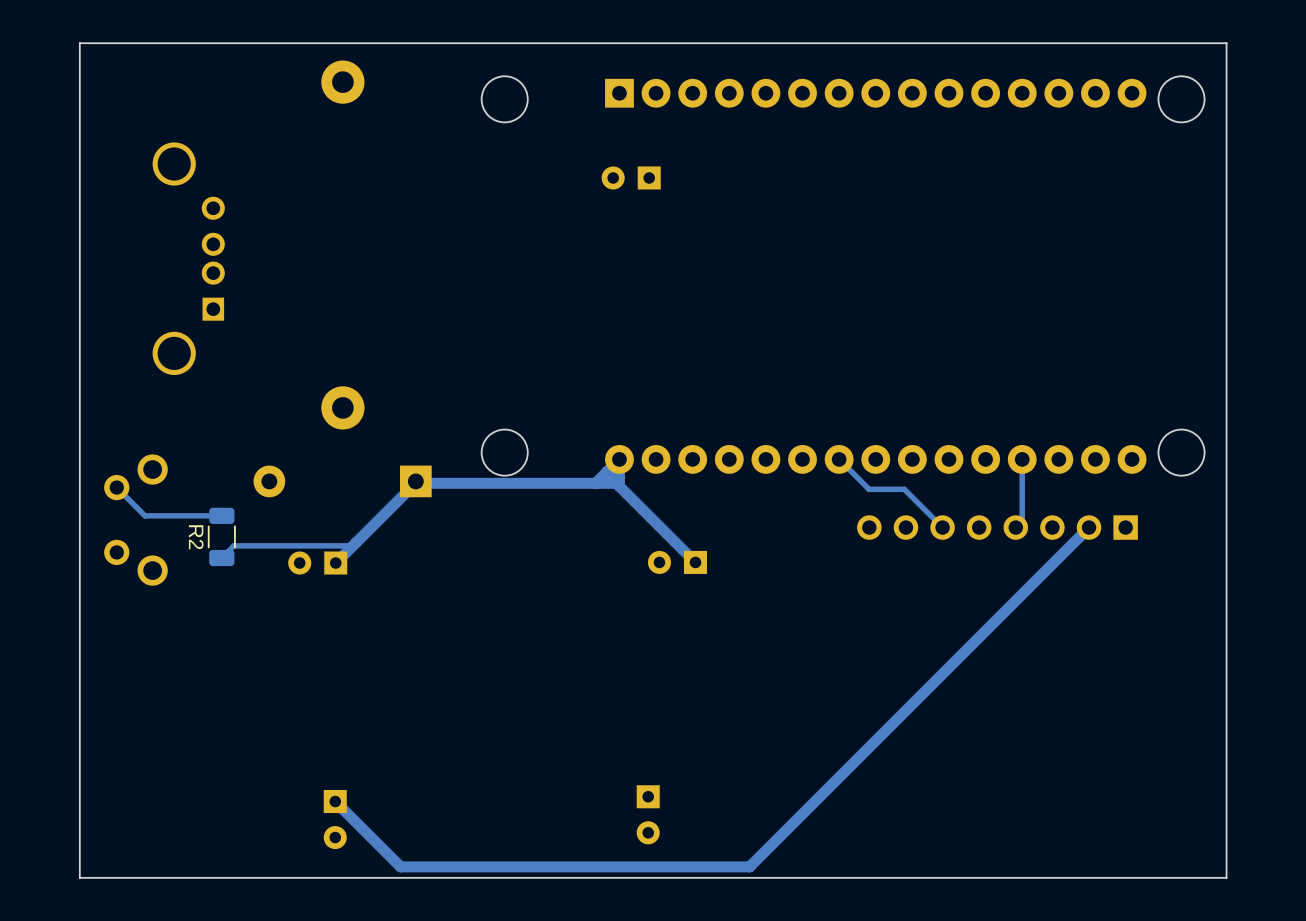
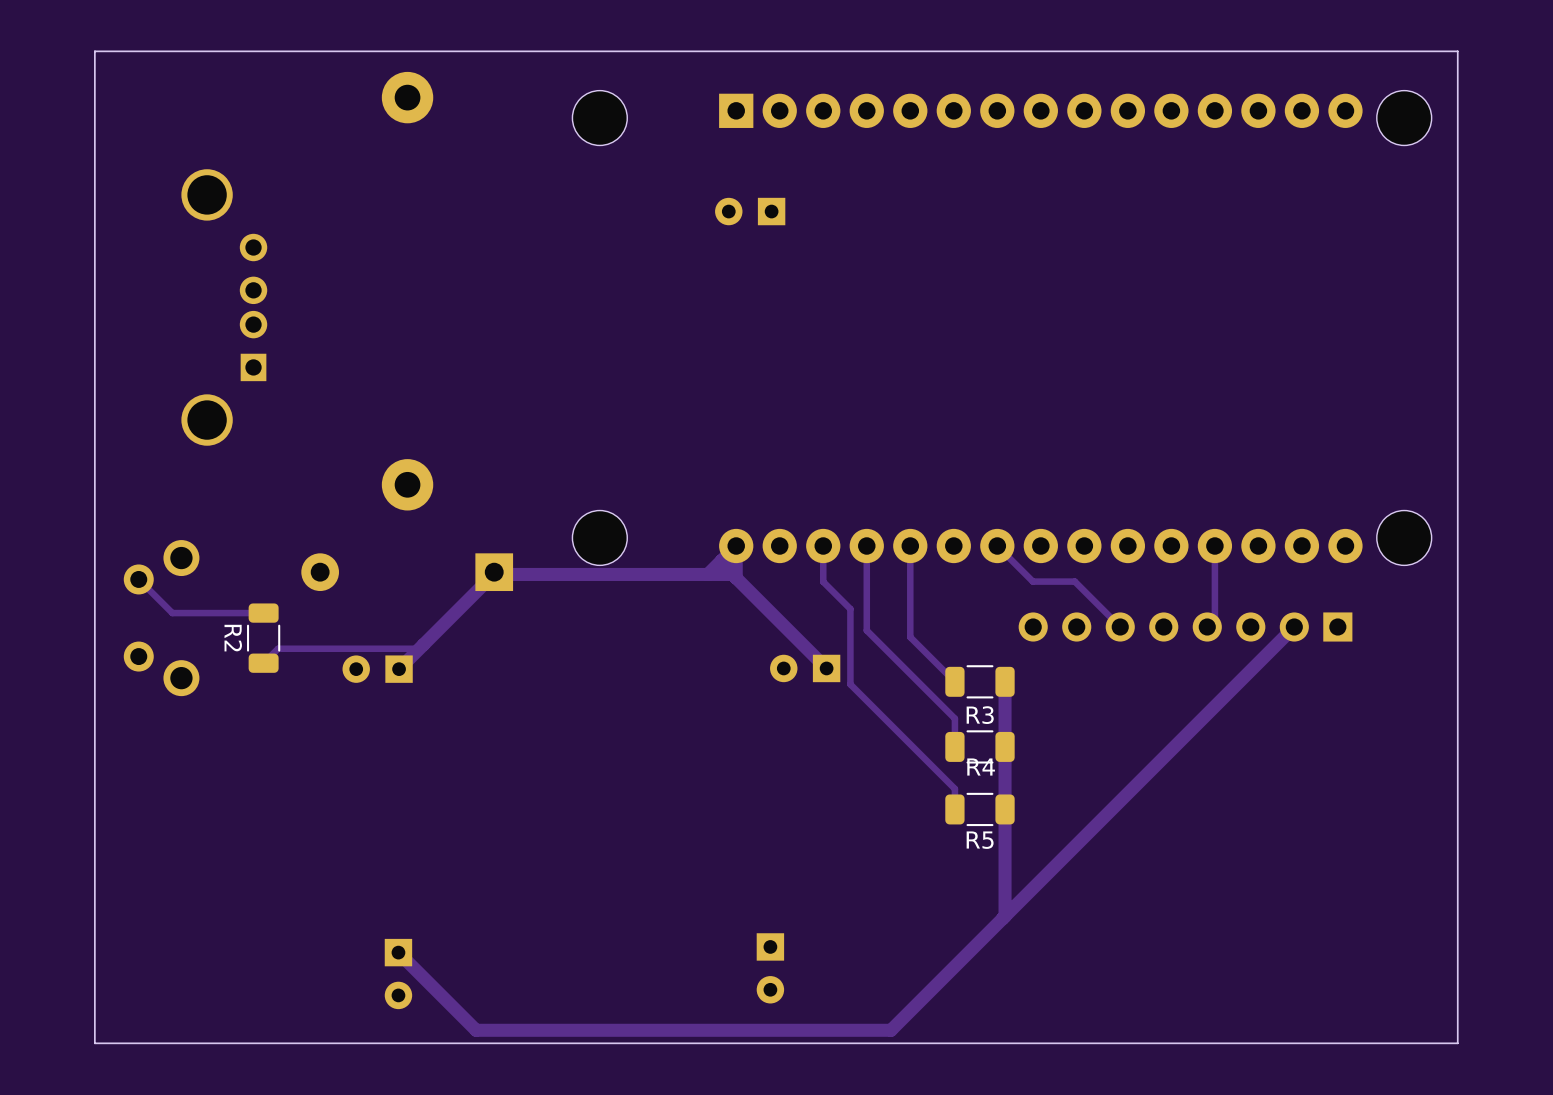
track: none -> (823, 546) (823, 581) (850, 609) (850, 684) (954, 788) (954, 809)
track: none -> (866, 546) (866, 630) (954, 718) (954, 746)
track: none -> (910, 546) (910, 637) (954, 681)
R4: none -> (979, 681)
track: none -> (1005, 681) (1005, 916)
R3: none -> (979, 746)
R5: none -> (979, 809)

